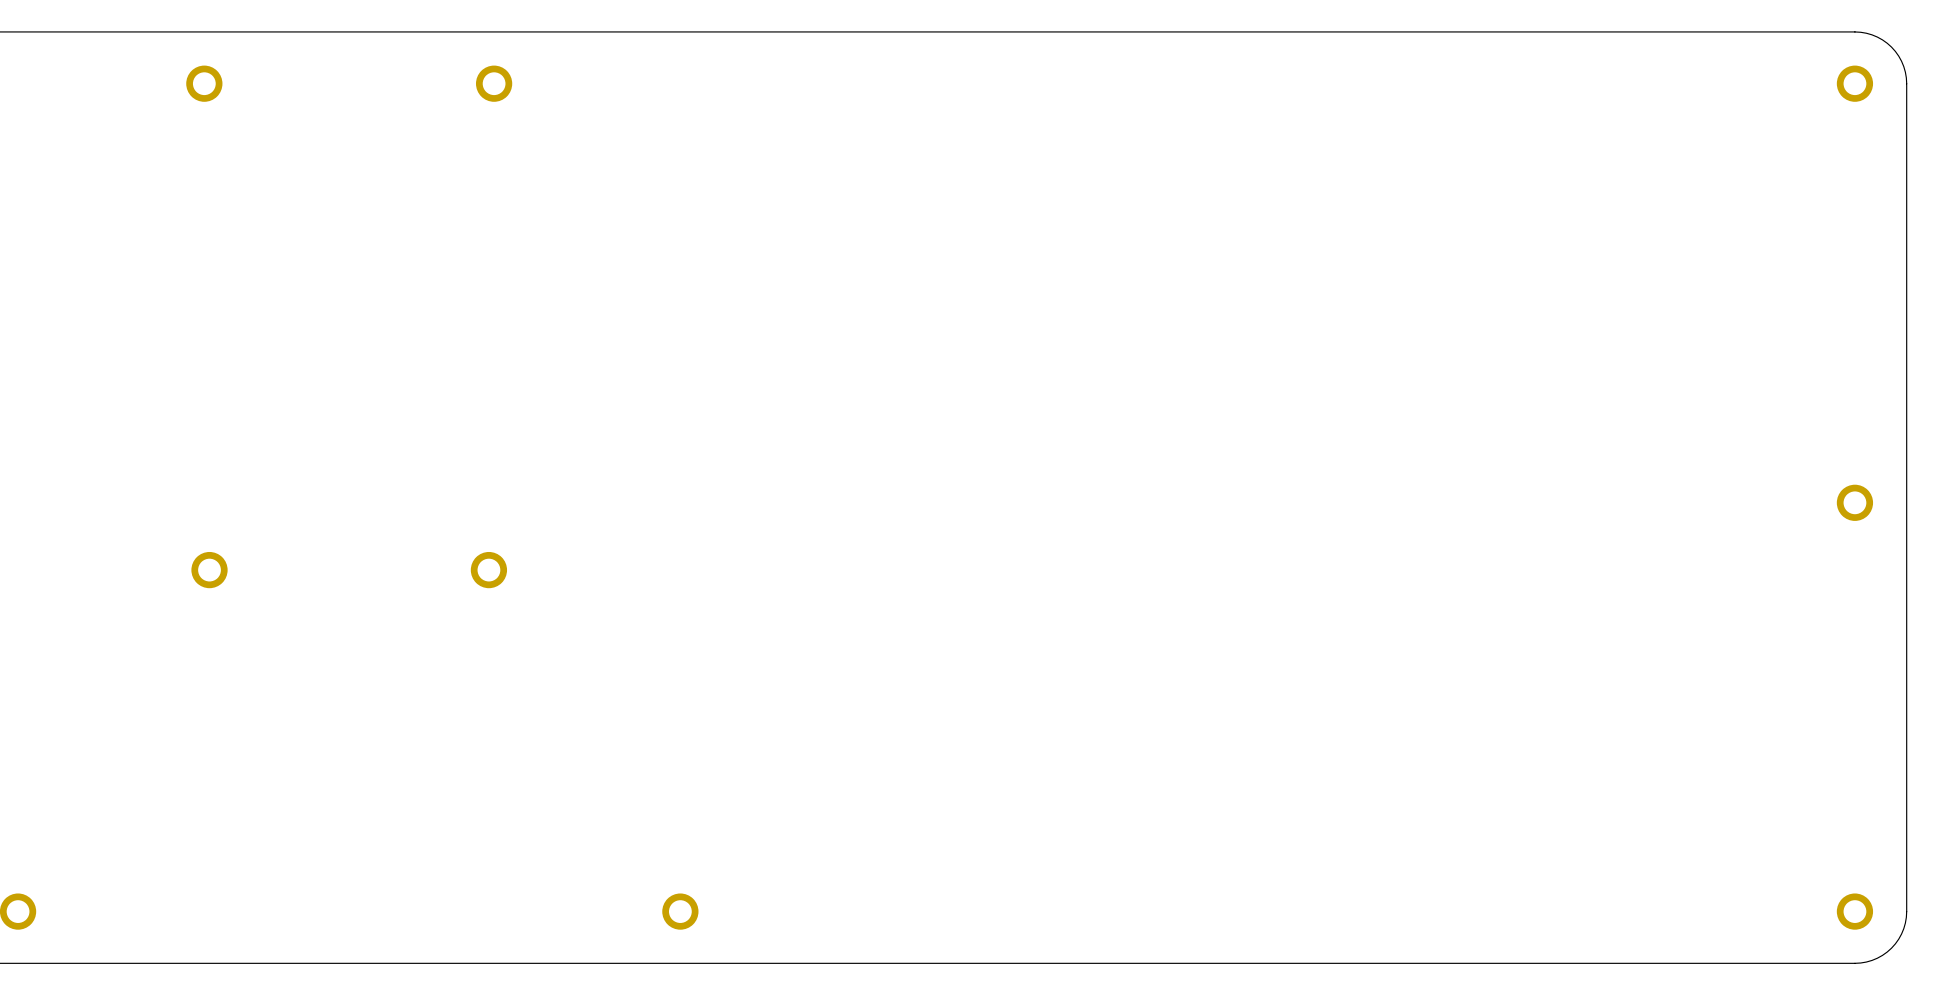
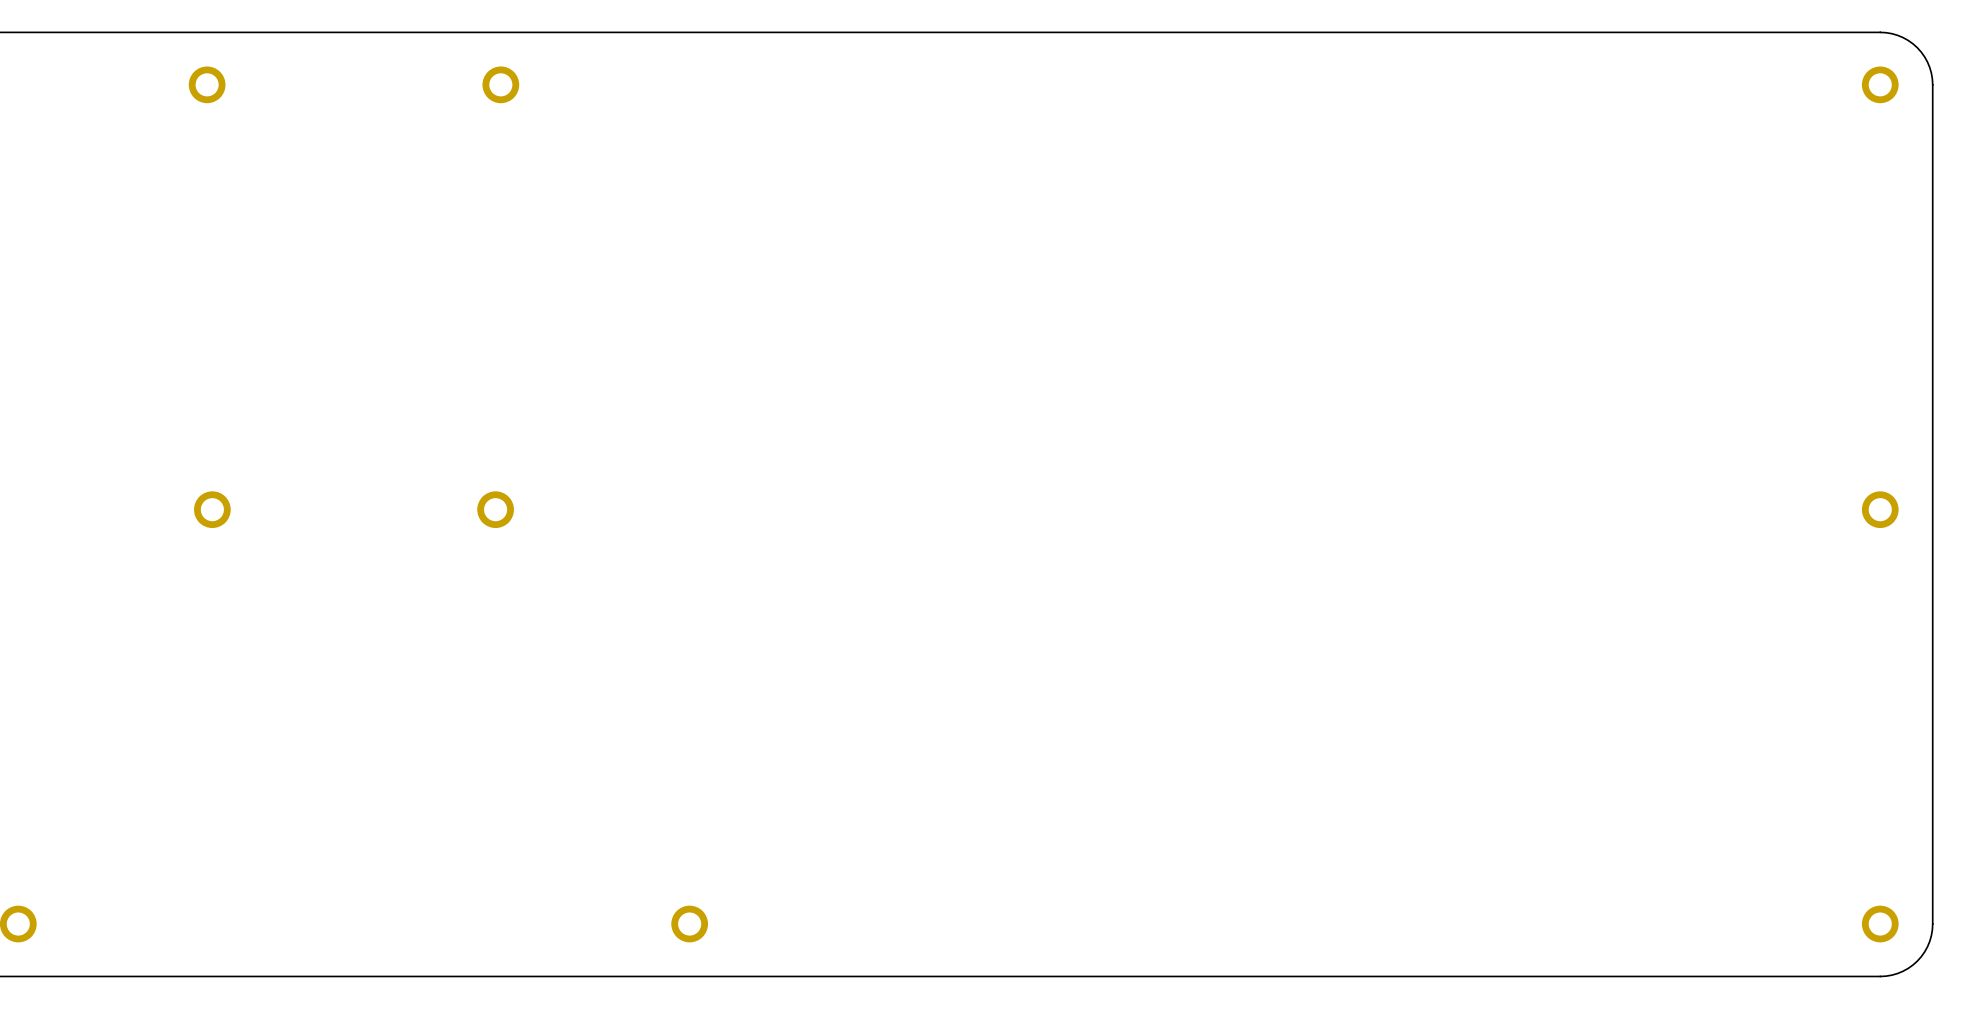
part position: (209, 570) -> (212, 509)
part position: (488, 570) -> (495, 509)

